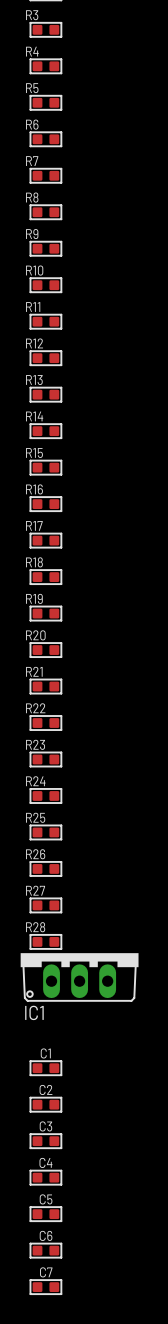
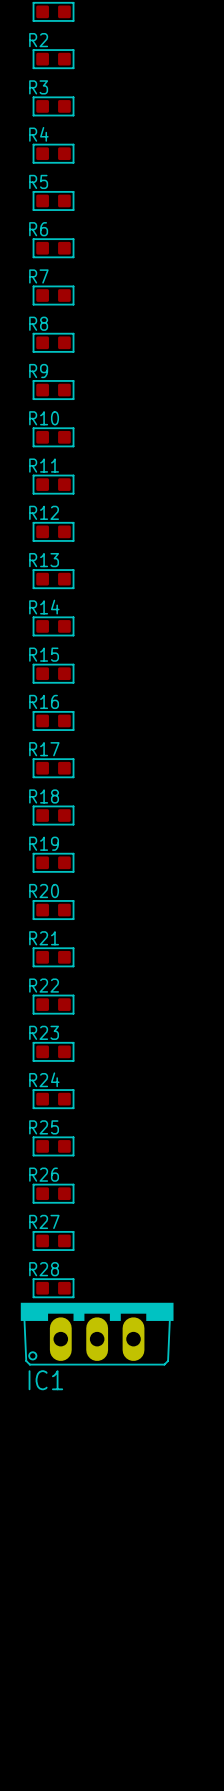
C1: (45, 1068) -> none
C2: (45, 1104) -> none
C3: (45, 1141) -> none
C4: (45, 1177) -> none
C5: (45, 1214) -> none
C6: (45, 1250) -> none
C7: (45, 1287) -> none

